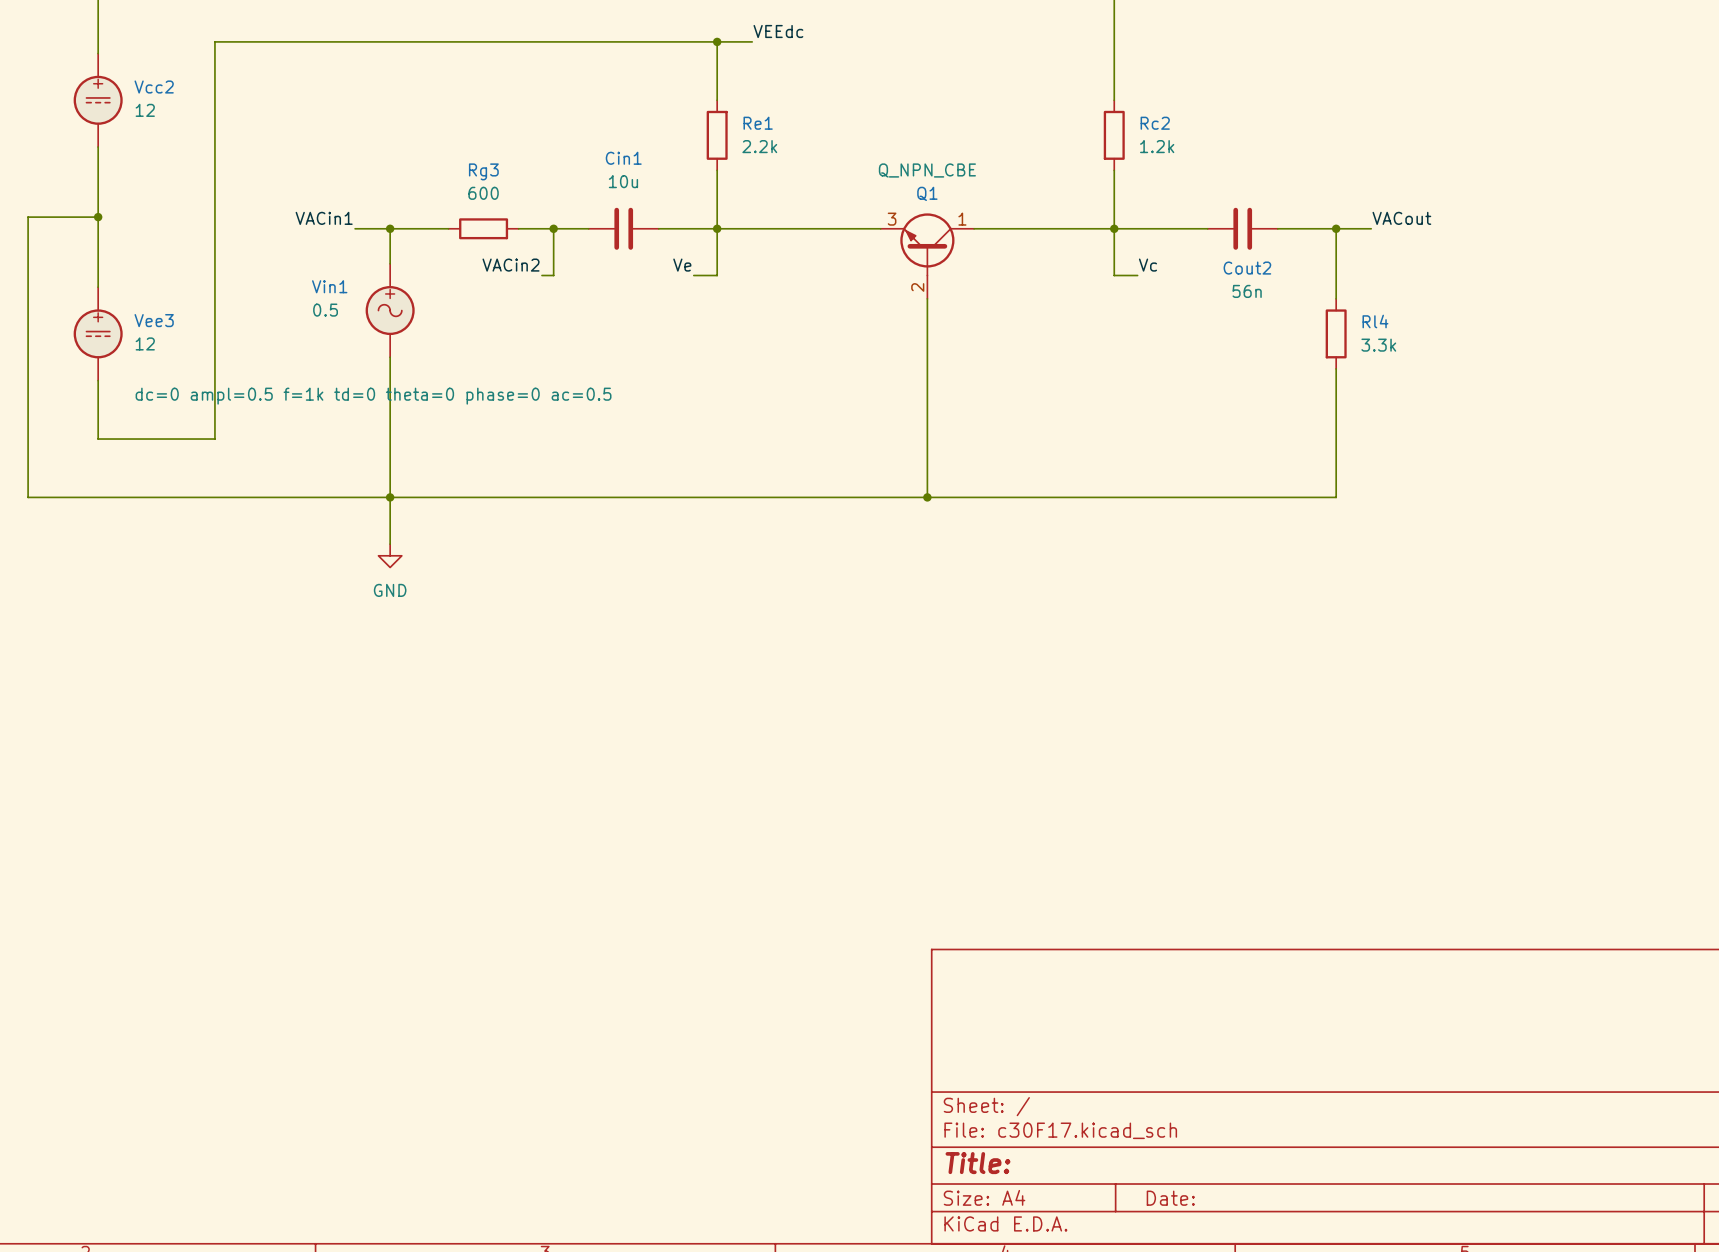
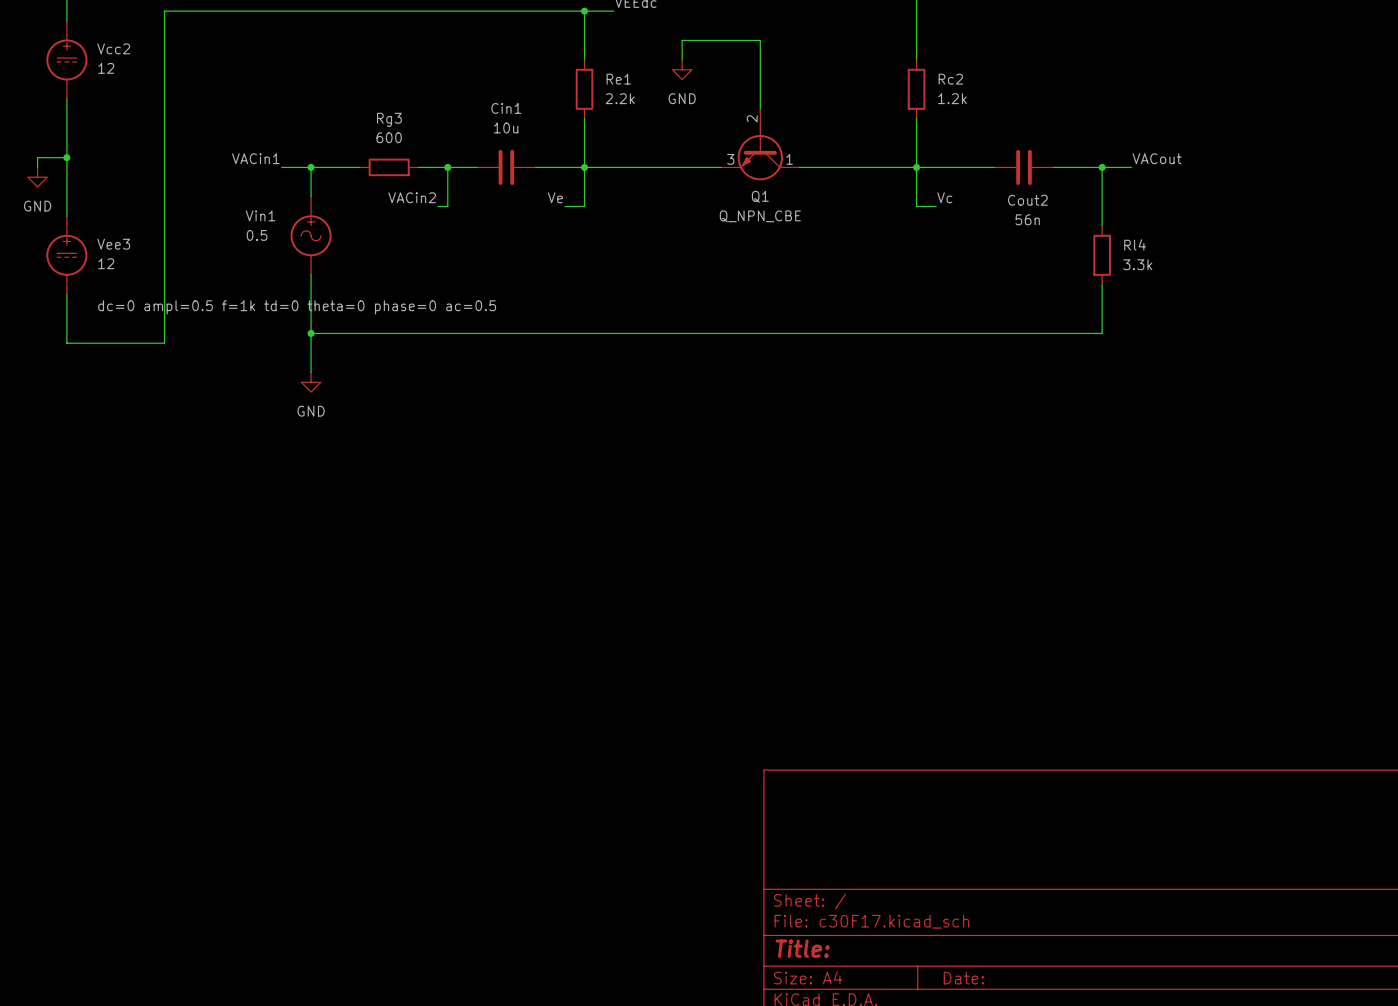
wire: none -> (682, 59) (682, 40) (760, 40) (760, 108)
power symbol: none -> GND (682, 69)
wire: (63, 217) (28, 217) (28, 497) (1336, 497) (1336, 427) -> (311, 333) (1102, 333)
wire: none -> (37, 157) (37, 167)
power symbol: none -> GND (37, 177)
Q1 flip: as is (927, 244) -> up-down (760, 154)
wire: (927, 298) (927, 497) -> none
junction: none -> (311, 333)
wire: (390, 474) (390, 544) -> none
junction: (390, 497) -> none
junction: (927, 497) -> none
power symbol position: GND (390, 555) -> GND (311, 382)

